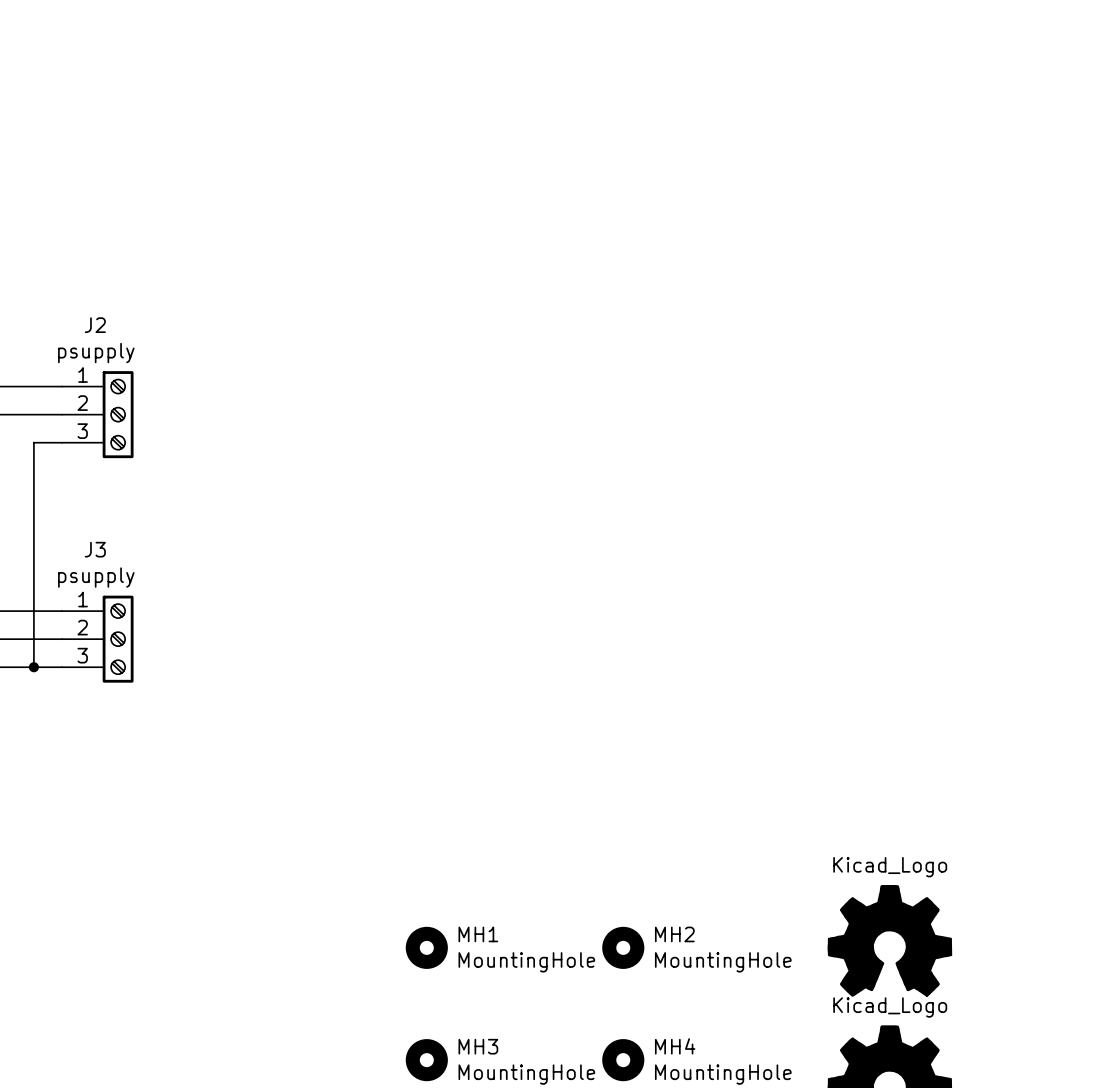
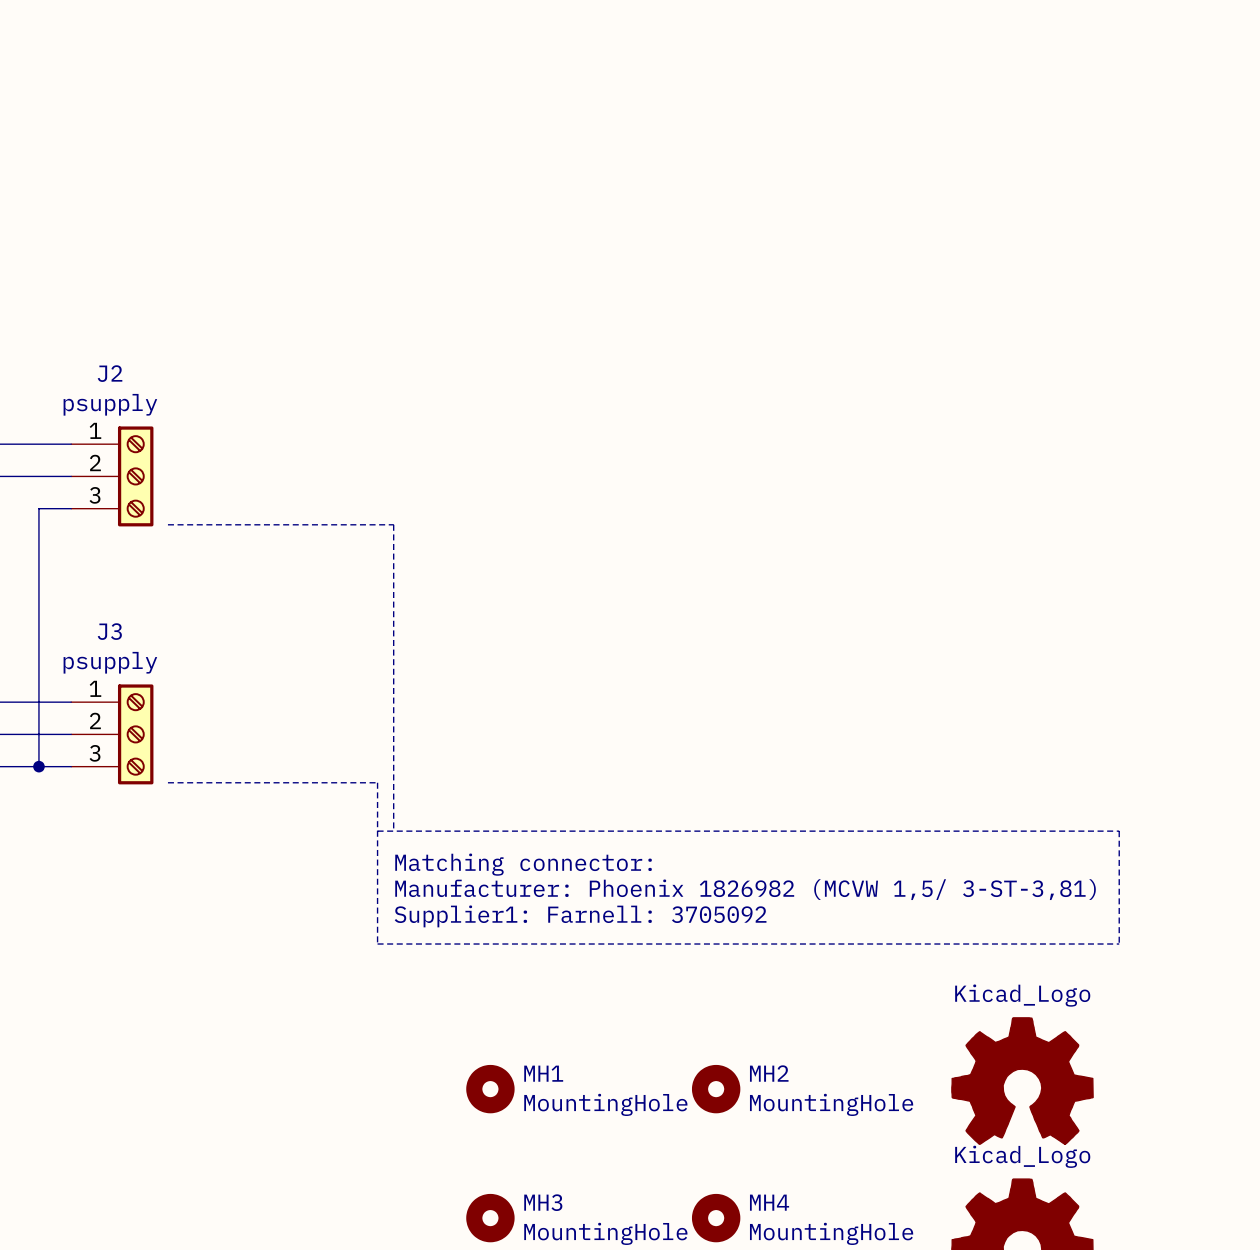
line: none -> (167, 524) (393, 524) (393, 831)
line: none -> (167, 782) (377, 782) (377, 944) (1119, 944) (1119, 831) (377, 831)
text: none -> Matching connector: (523, 864)
text: none -> Manufacturer: Phoenix 1826982 (MCVW 1,5/ 3-ST-3,81) (745, 889)
text: none -> Supplier1: Farnell: 3705092 (580, 916)

